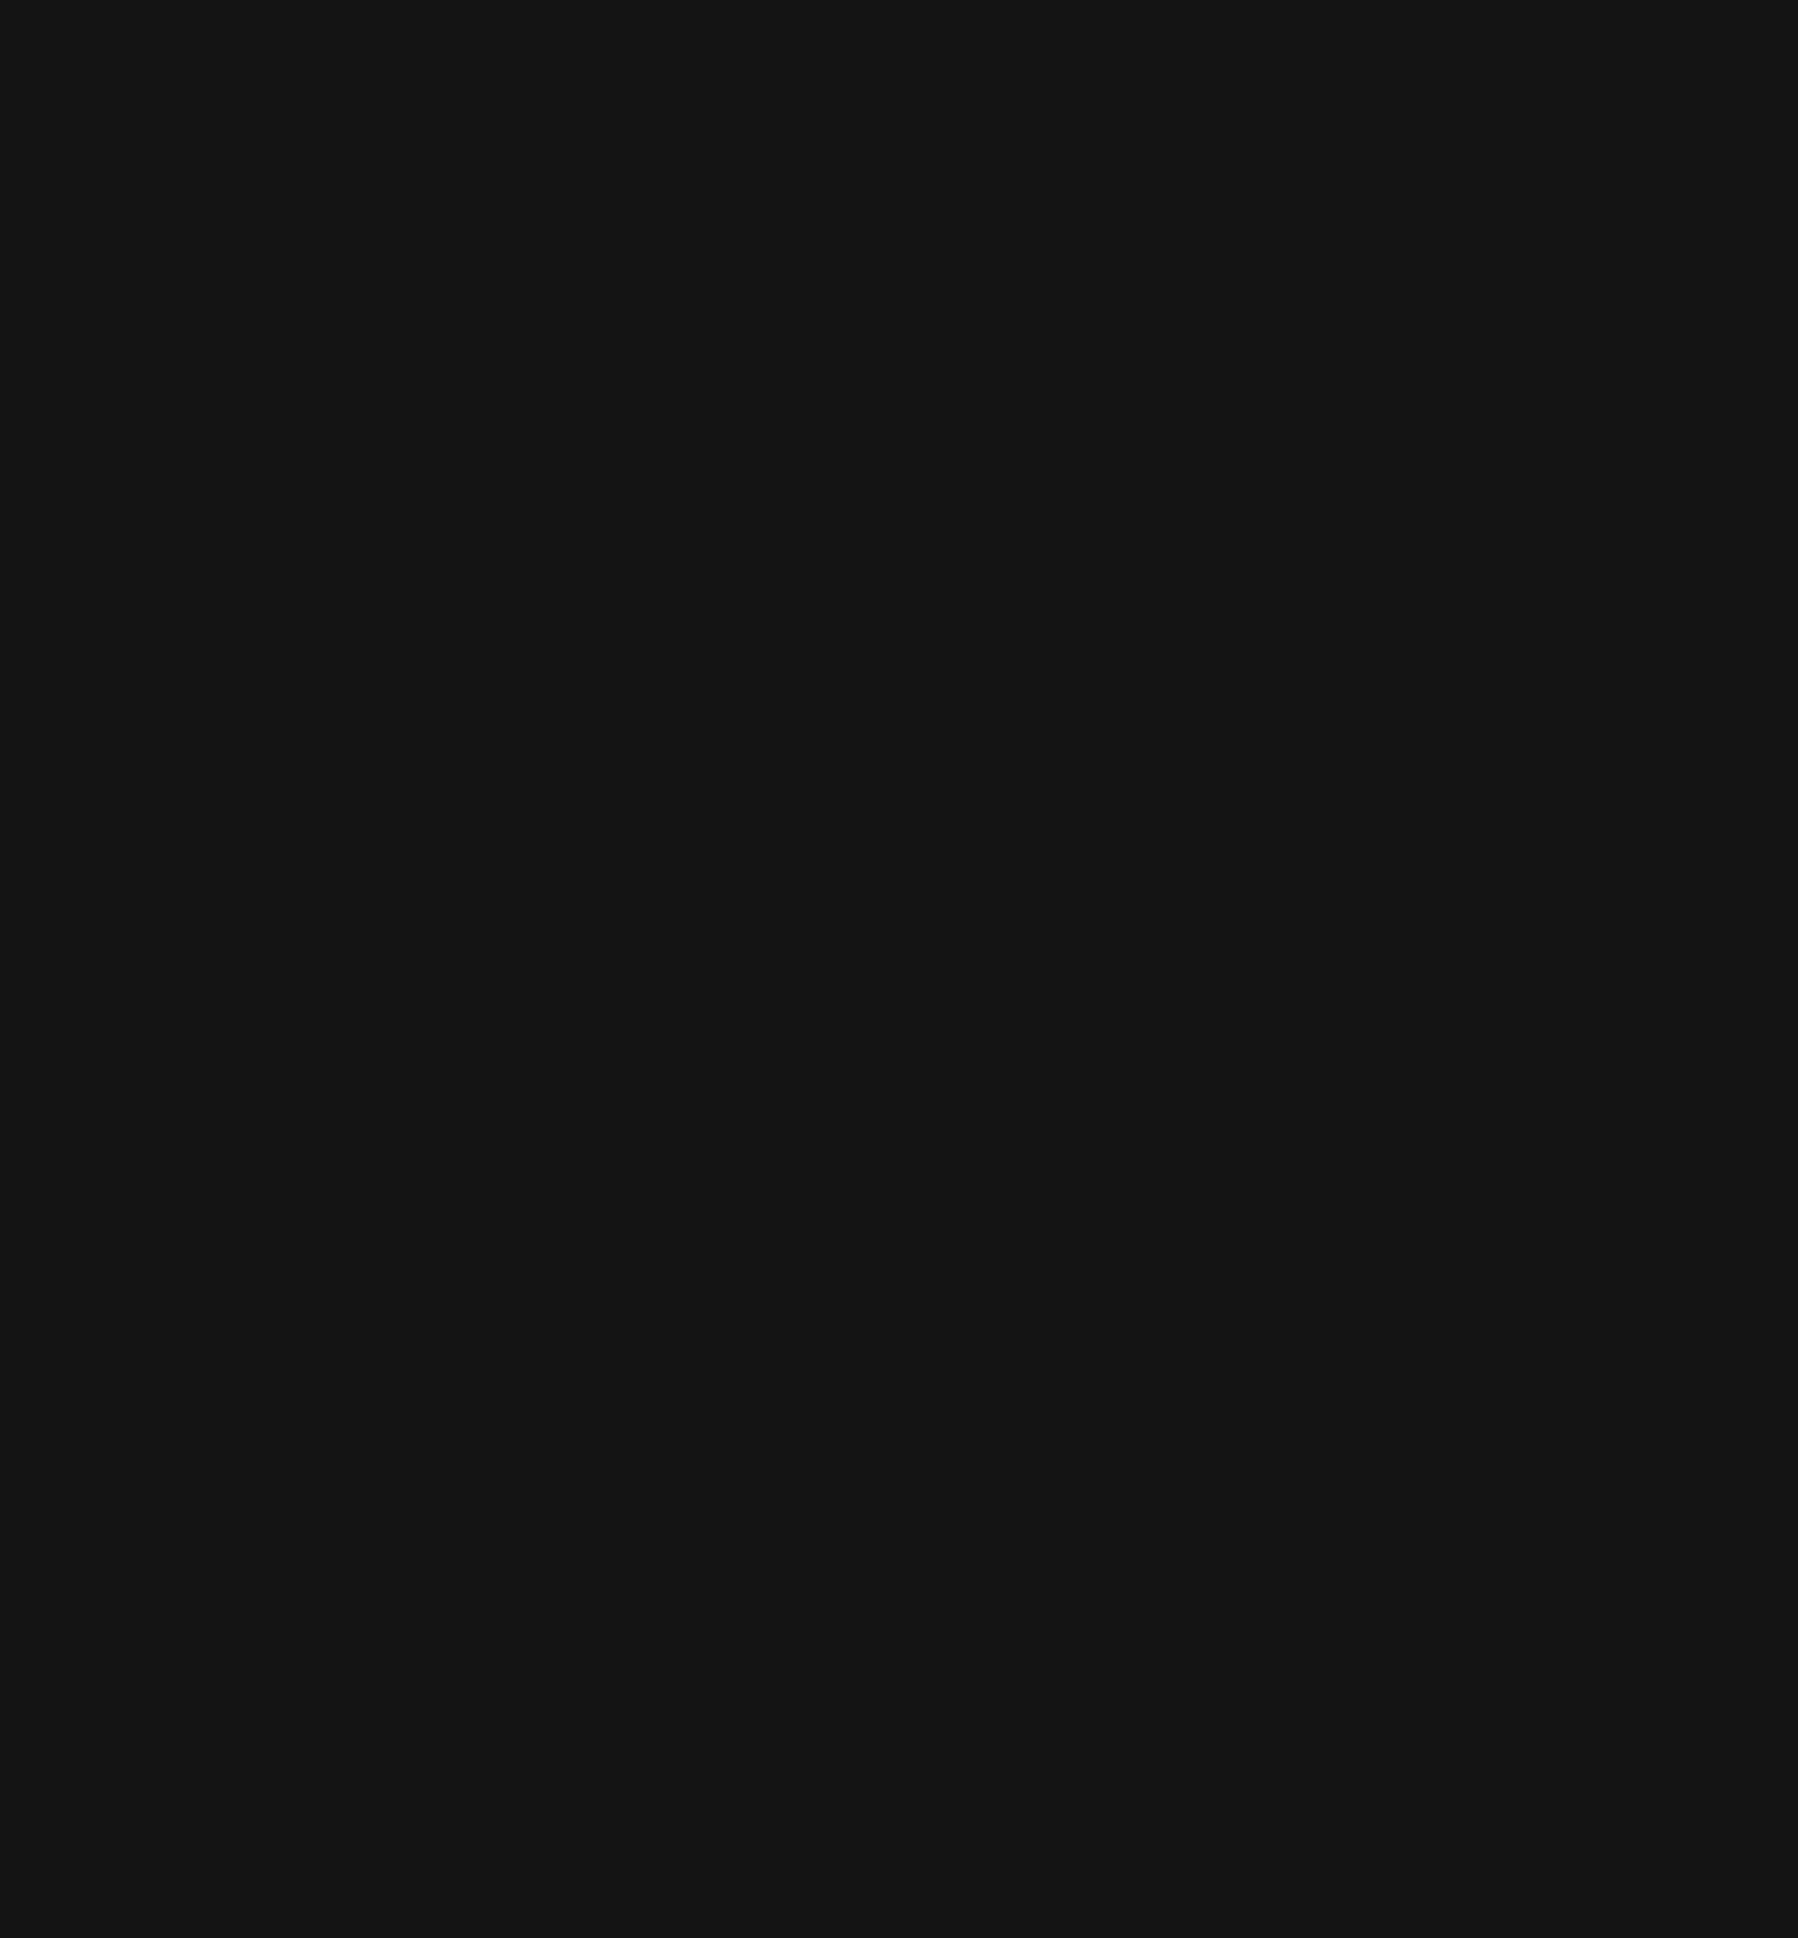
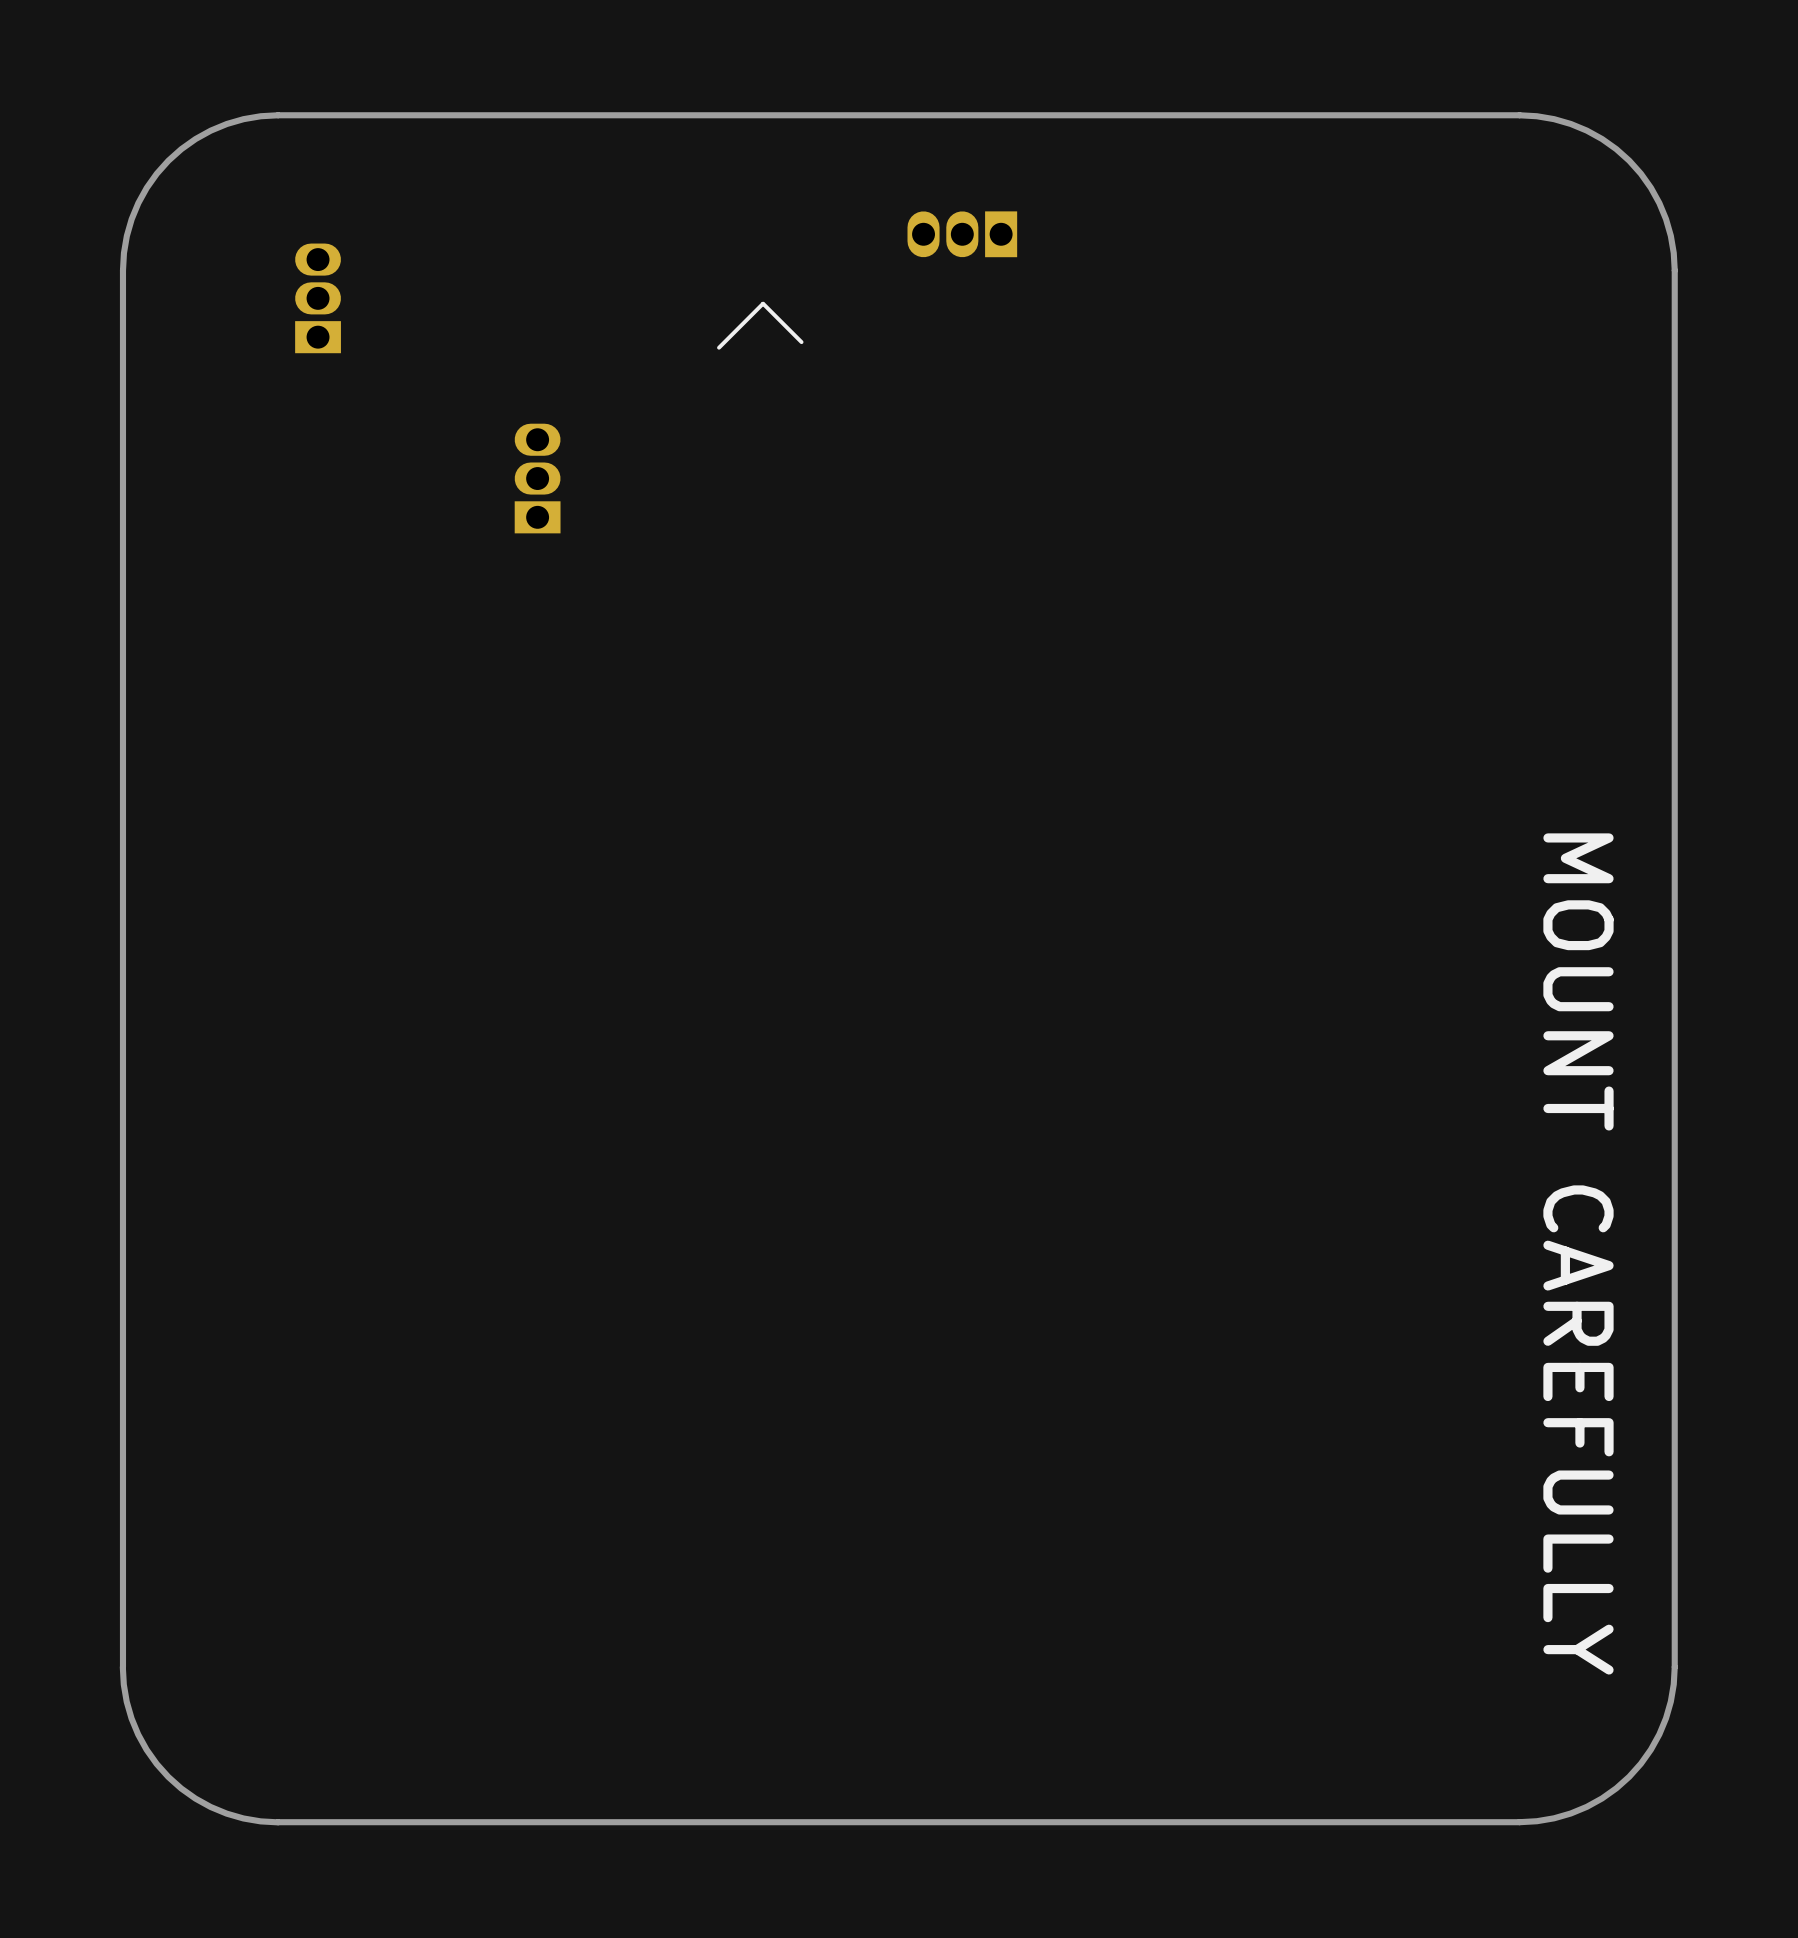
part: none -> (962, 234)
part: none -> (318, 298)
line: none -> (762, 303) (719, 347)
line: none -> (763, 303) (801, 342)
part: none -> (537, 478)
text: none -> MOUNT CAREFULLY (1578, 1253)
board edge: none -> (122, 1667) (122, 270) (126, 235) (138, 203) (146, 187) (168, 160) (195, 139) (210, 130) (243, 119) (278, 115) (1519, 115) (1554, 119) (1586, 130) (1602, 139) (1629, 160) (1650, 187) (1659, 203) (1670, 235) (1674, 270) (1674, 1667) (1673, 1684) (1666, 1718) (1650, 1749) (1640, 1763) (1616, 1788) (1586, 1806) (1554, 1818) (1519, 1822) (278, 1822)
board edge: none -> (122, 1667) (126, 1701) (138, 1734) (156, 1763) (168, 1776) (181, 1788) (210, 1806) (243, 1818) (278, 1822)

